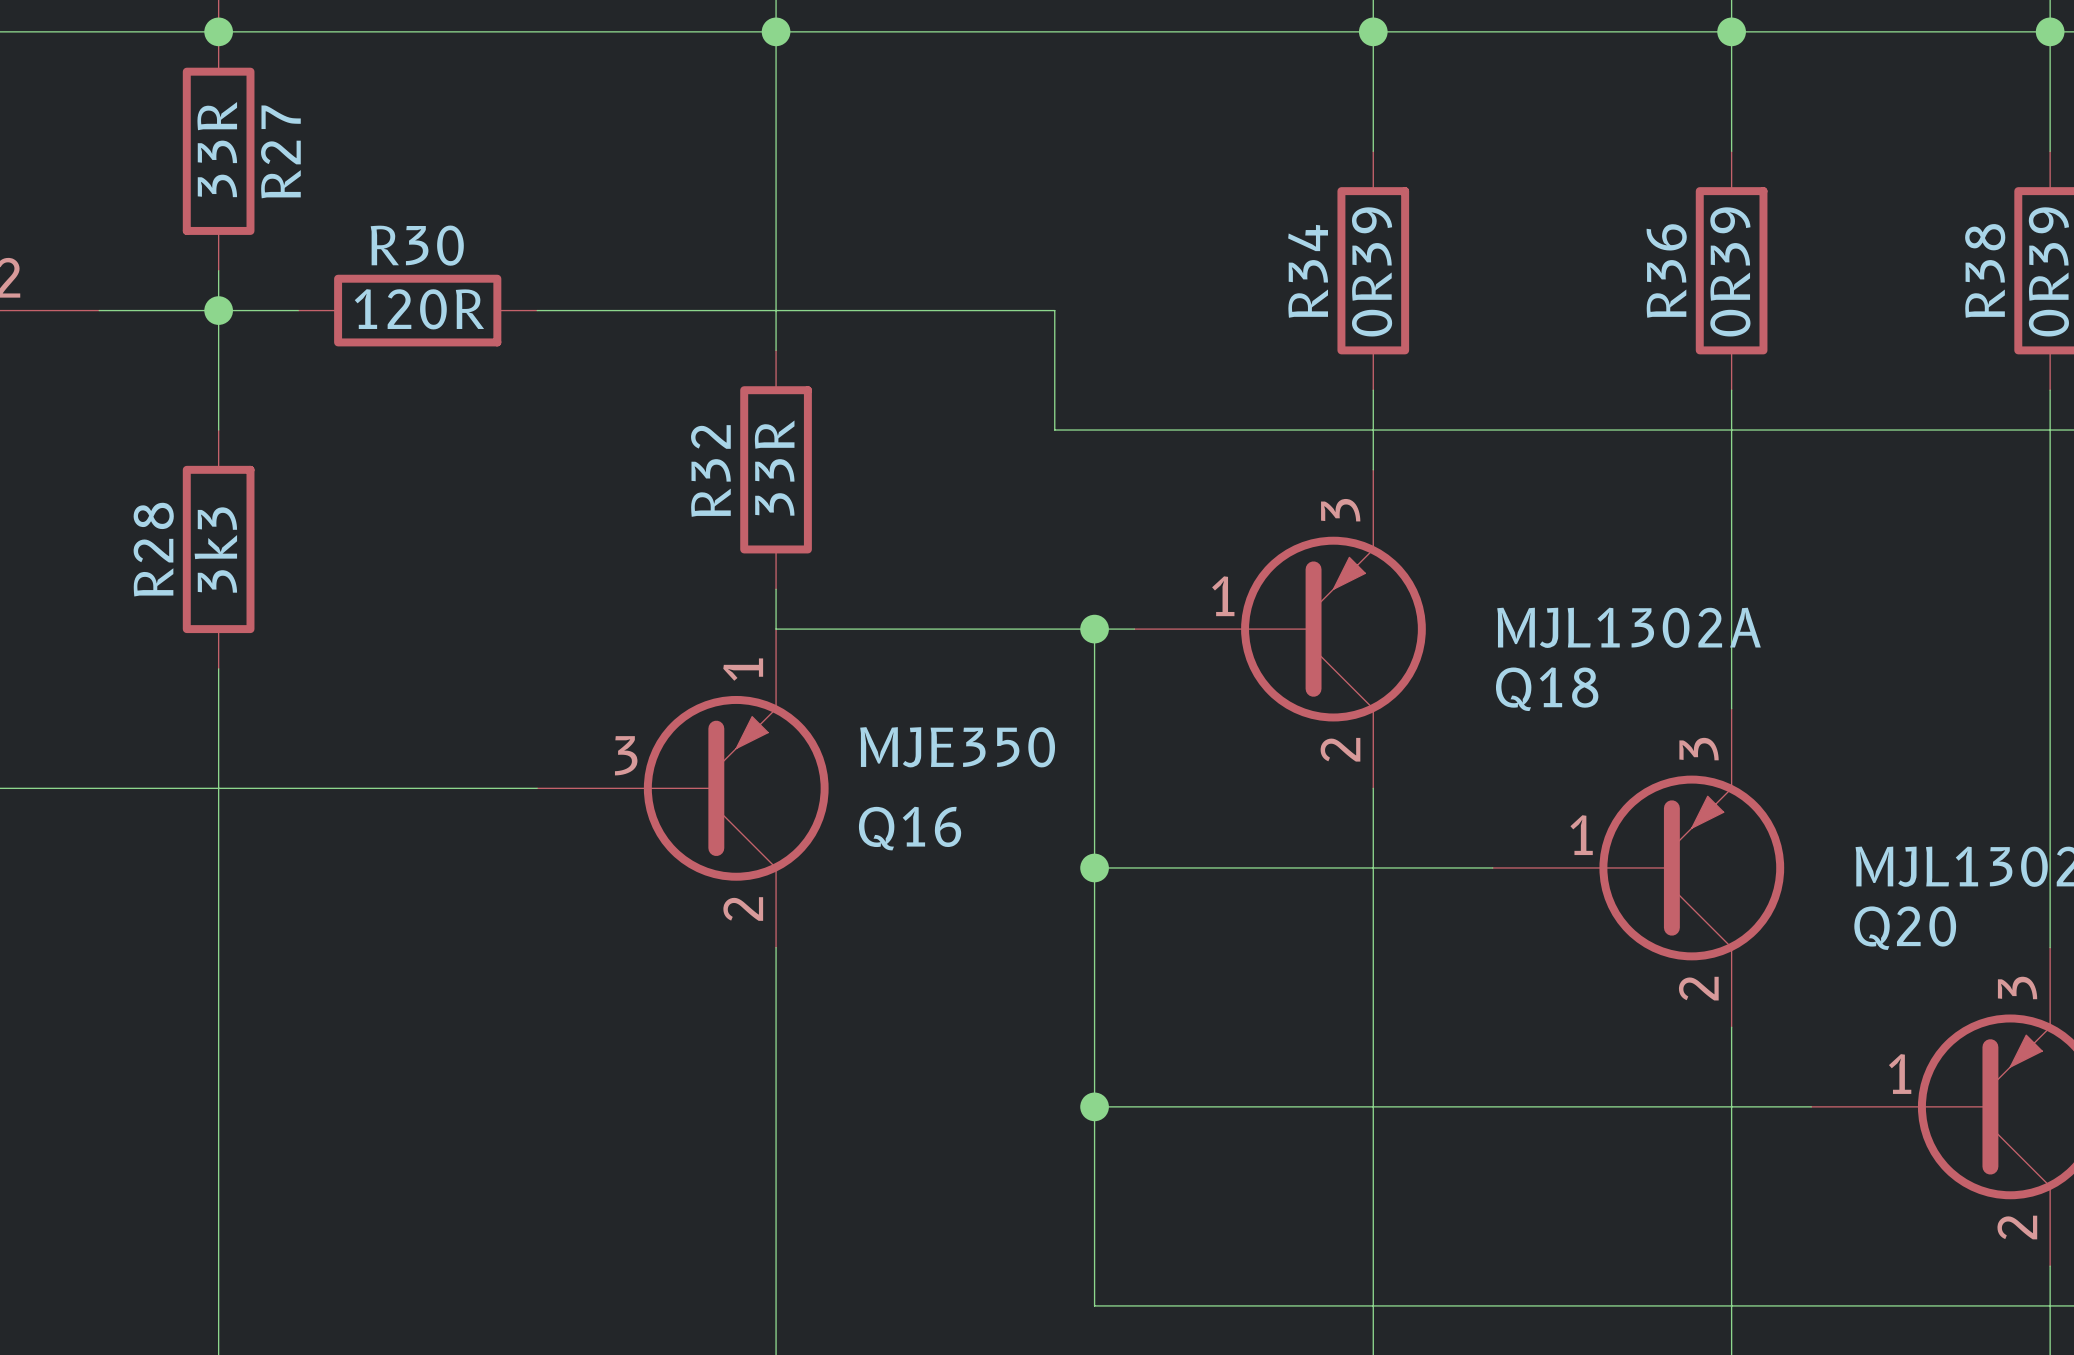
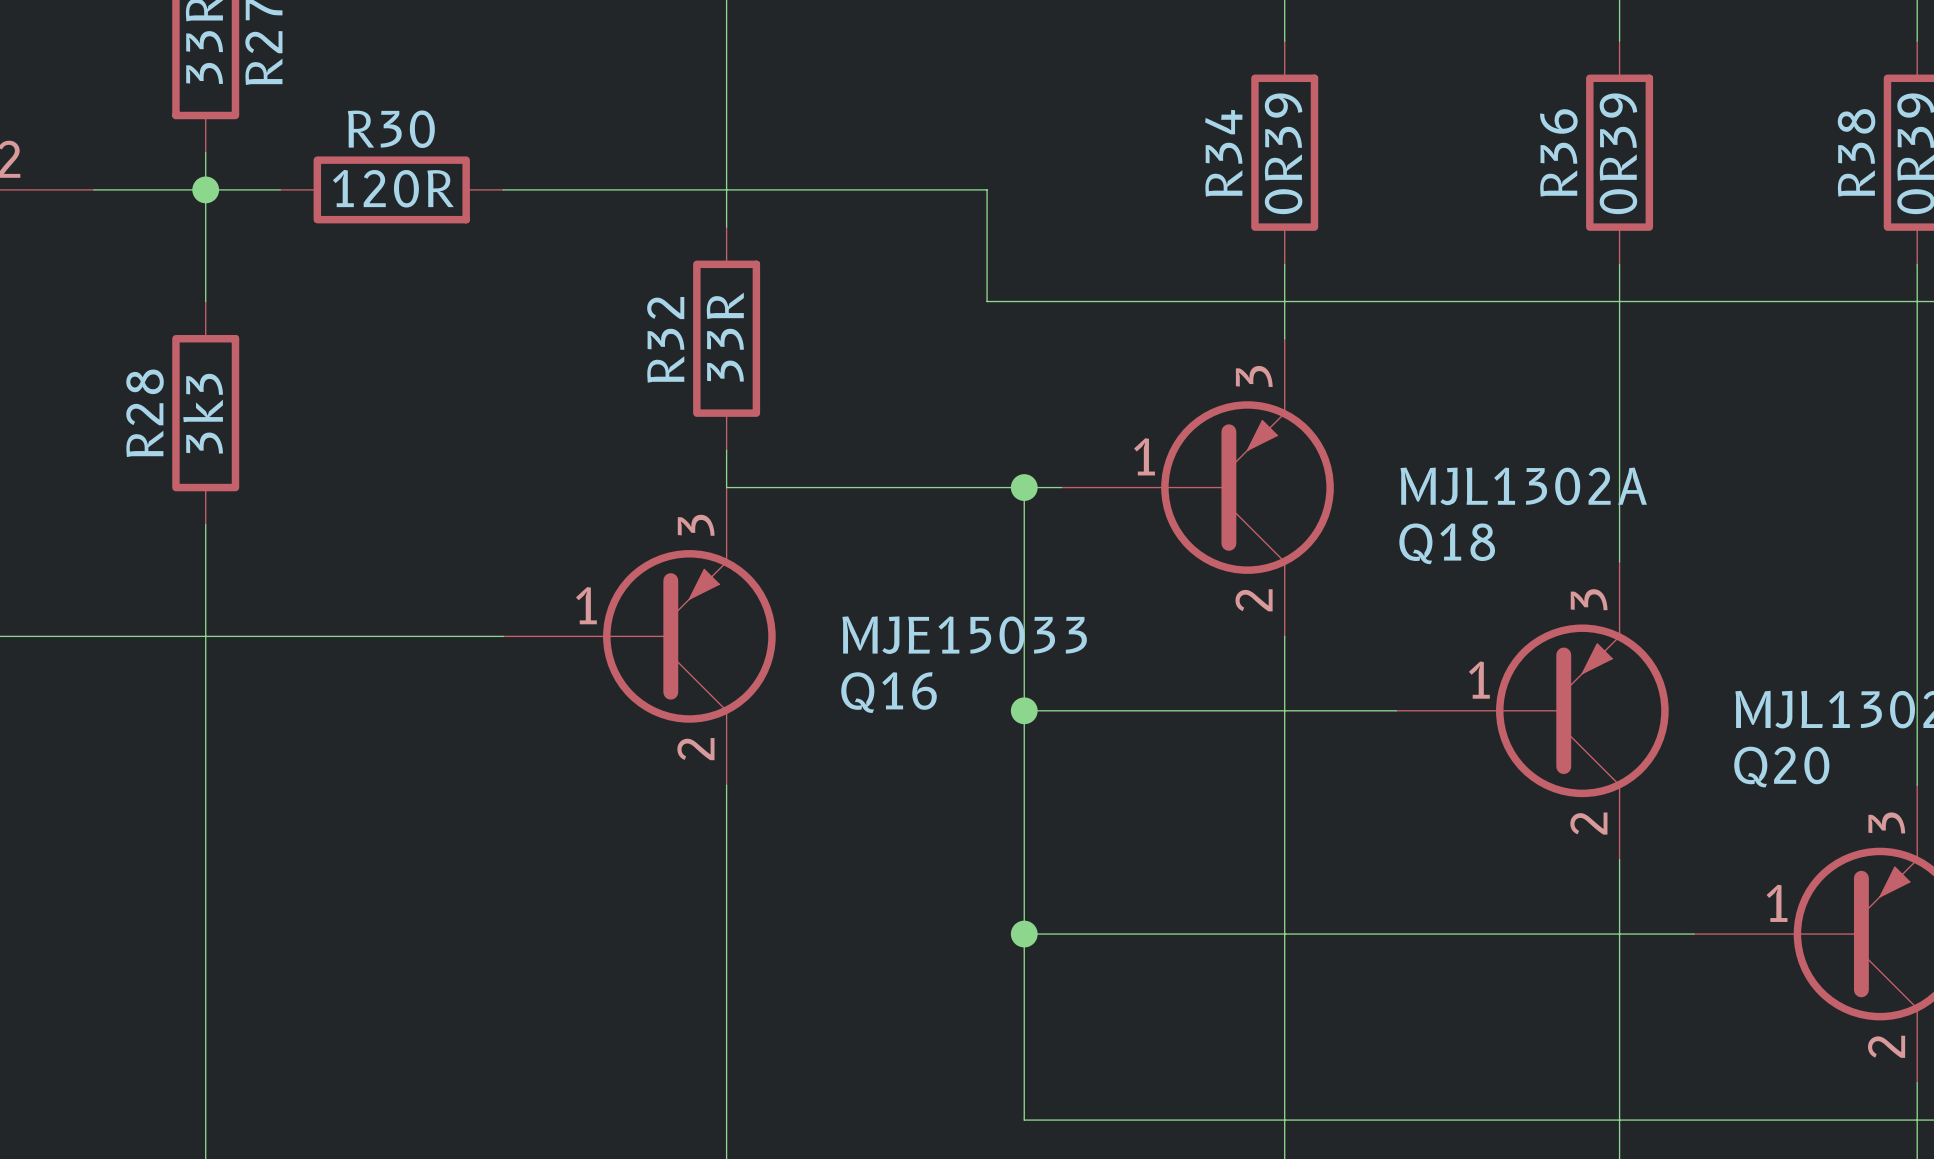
Q16 pin number: 1 (743, 669) -> 3 (696, 525)
Q16 value: MJE350 (957, 747) -> MJE15033 (964, 635)
Q16 pin number: 3 (626, 755) -> 1 (586, 605)
Q16 name position: Q16 (910, 828) -> Q16 (889, 692)

